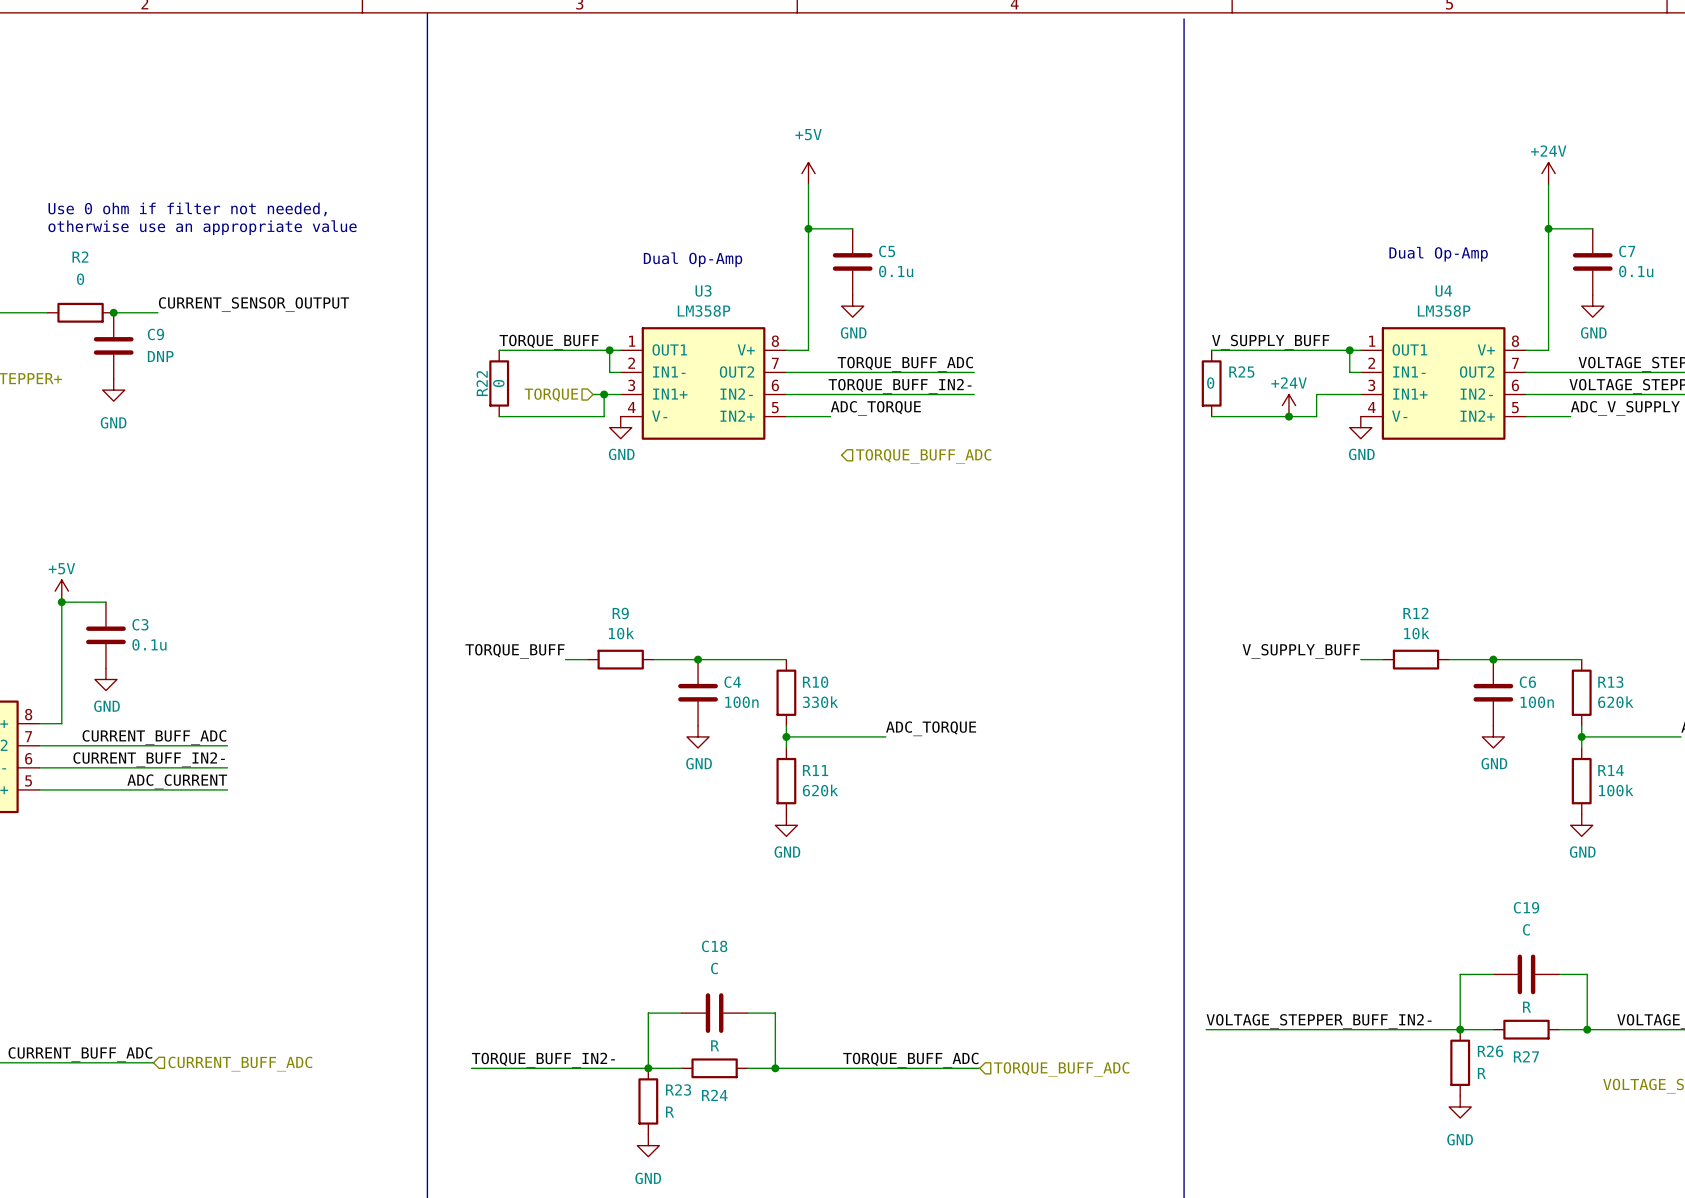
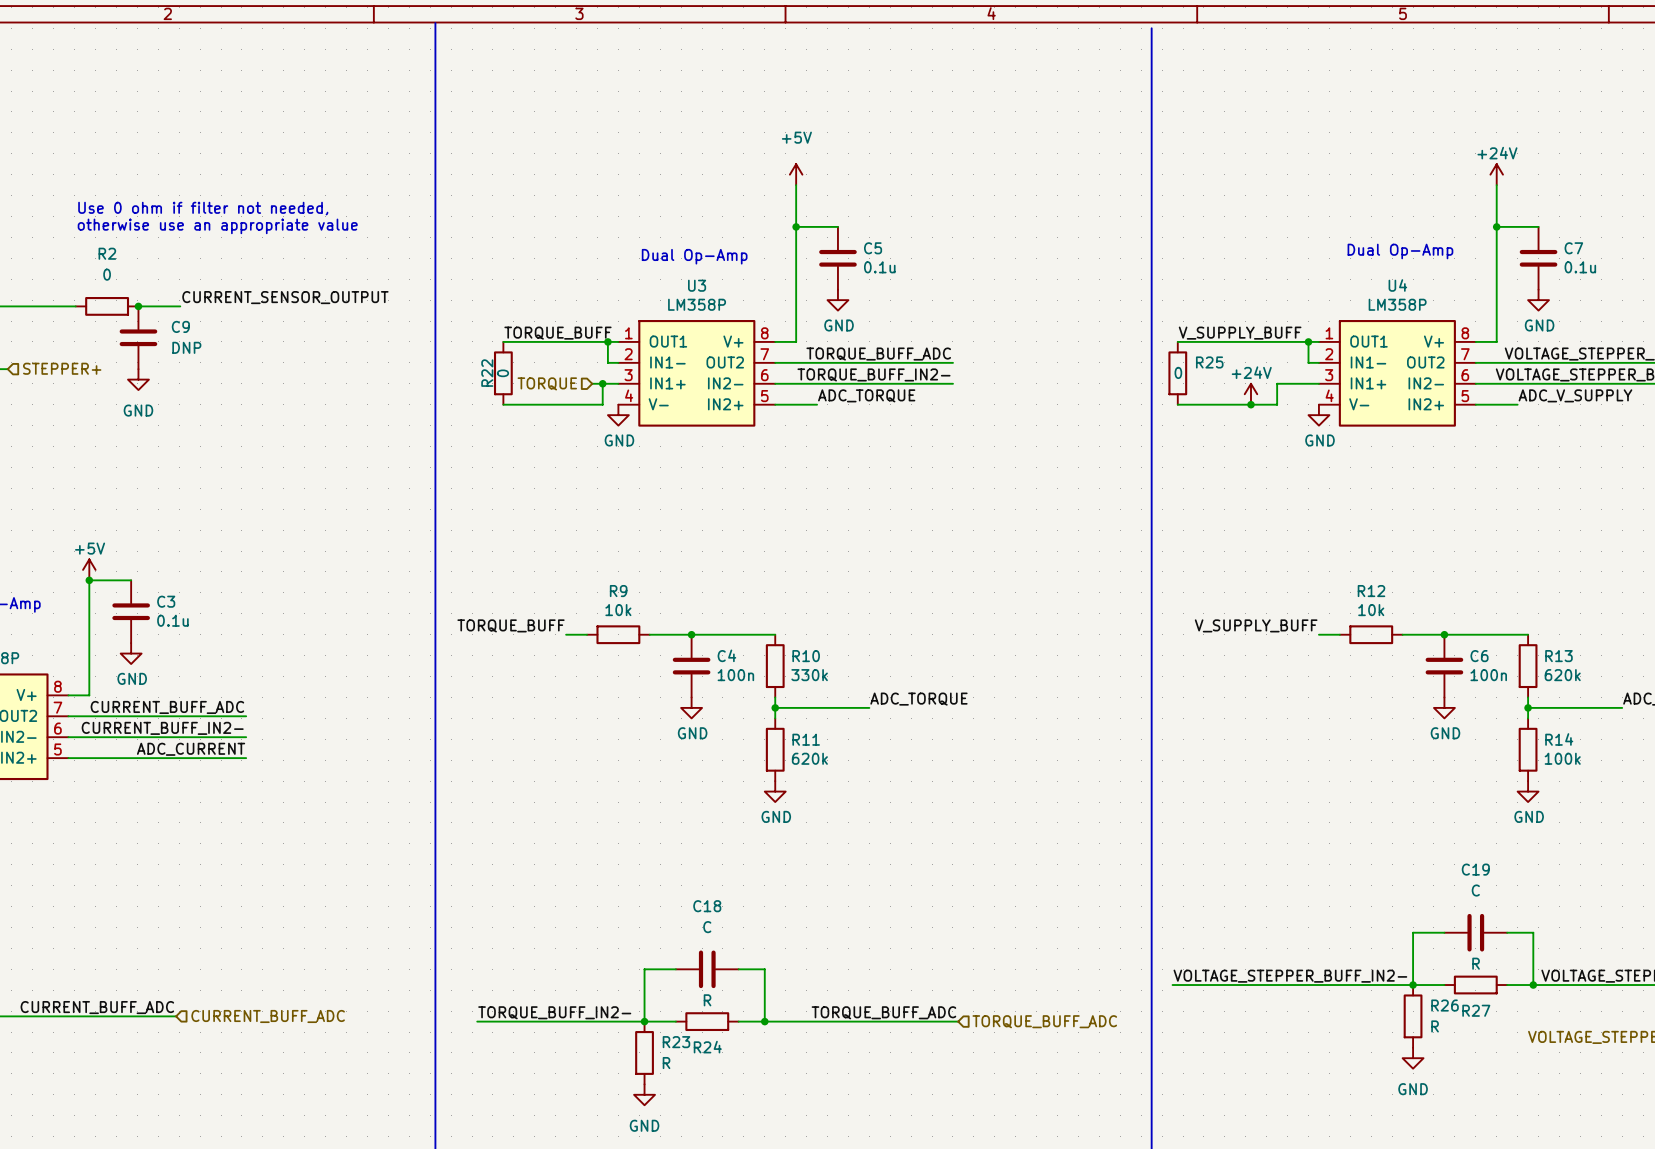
hierarchical label: TORQUE_BUFF_ADC (923, 456) -> none

